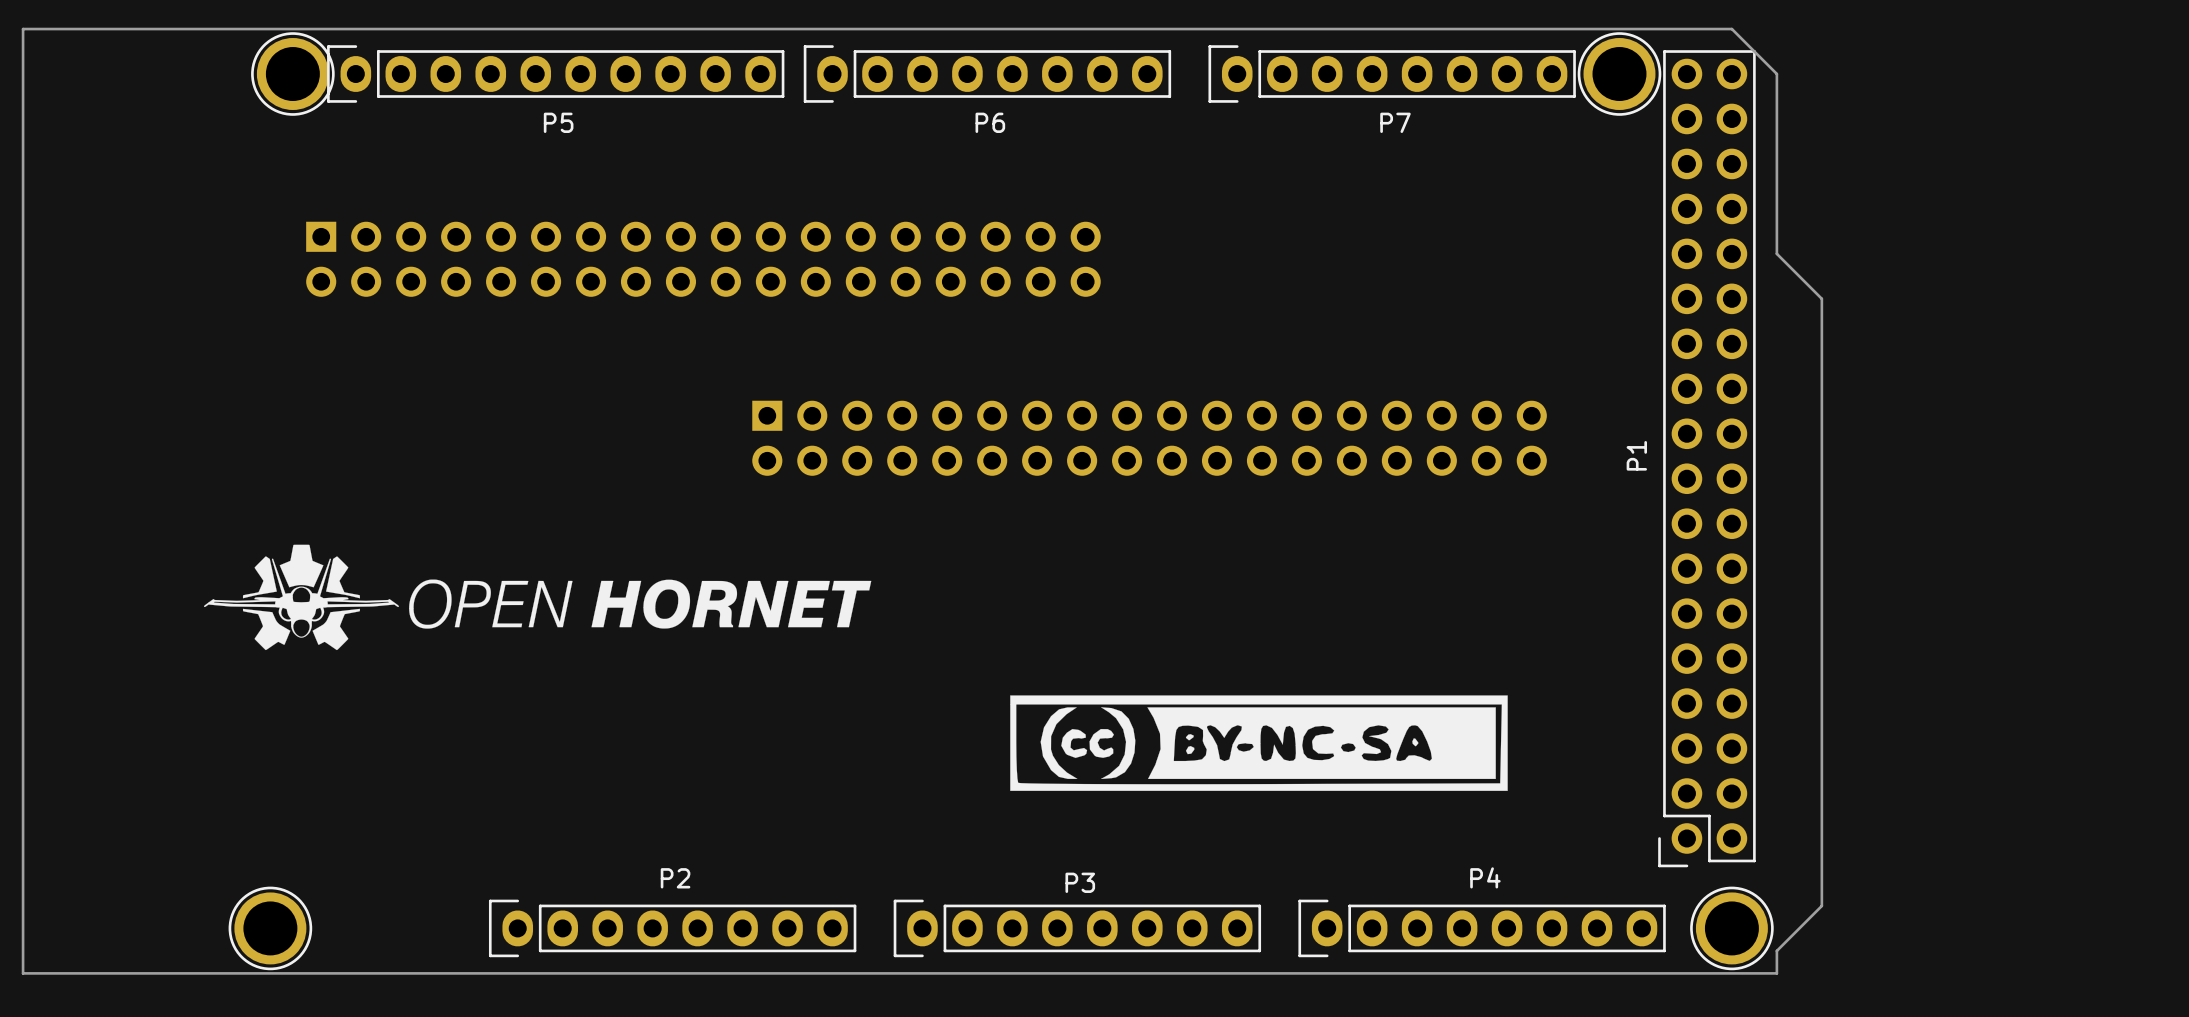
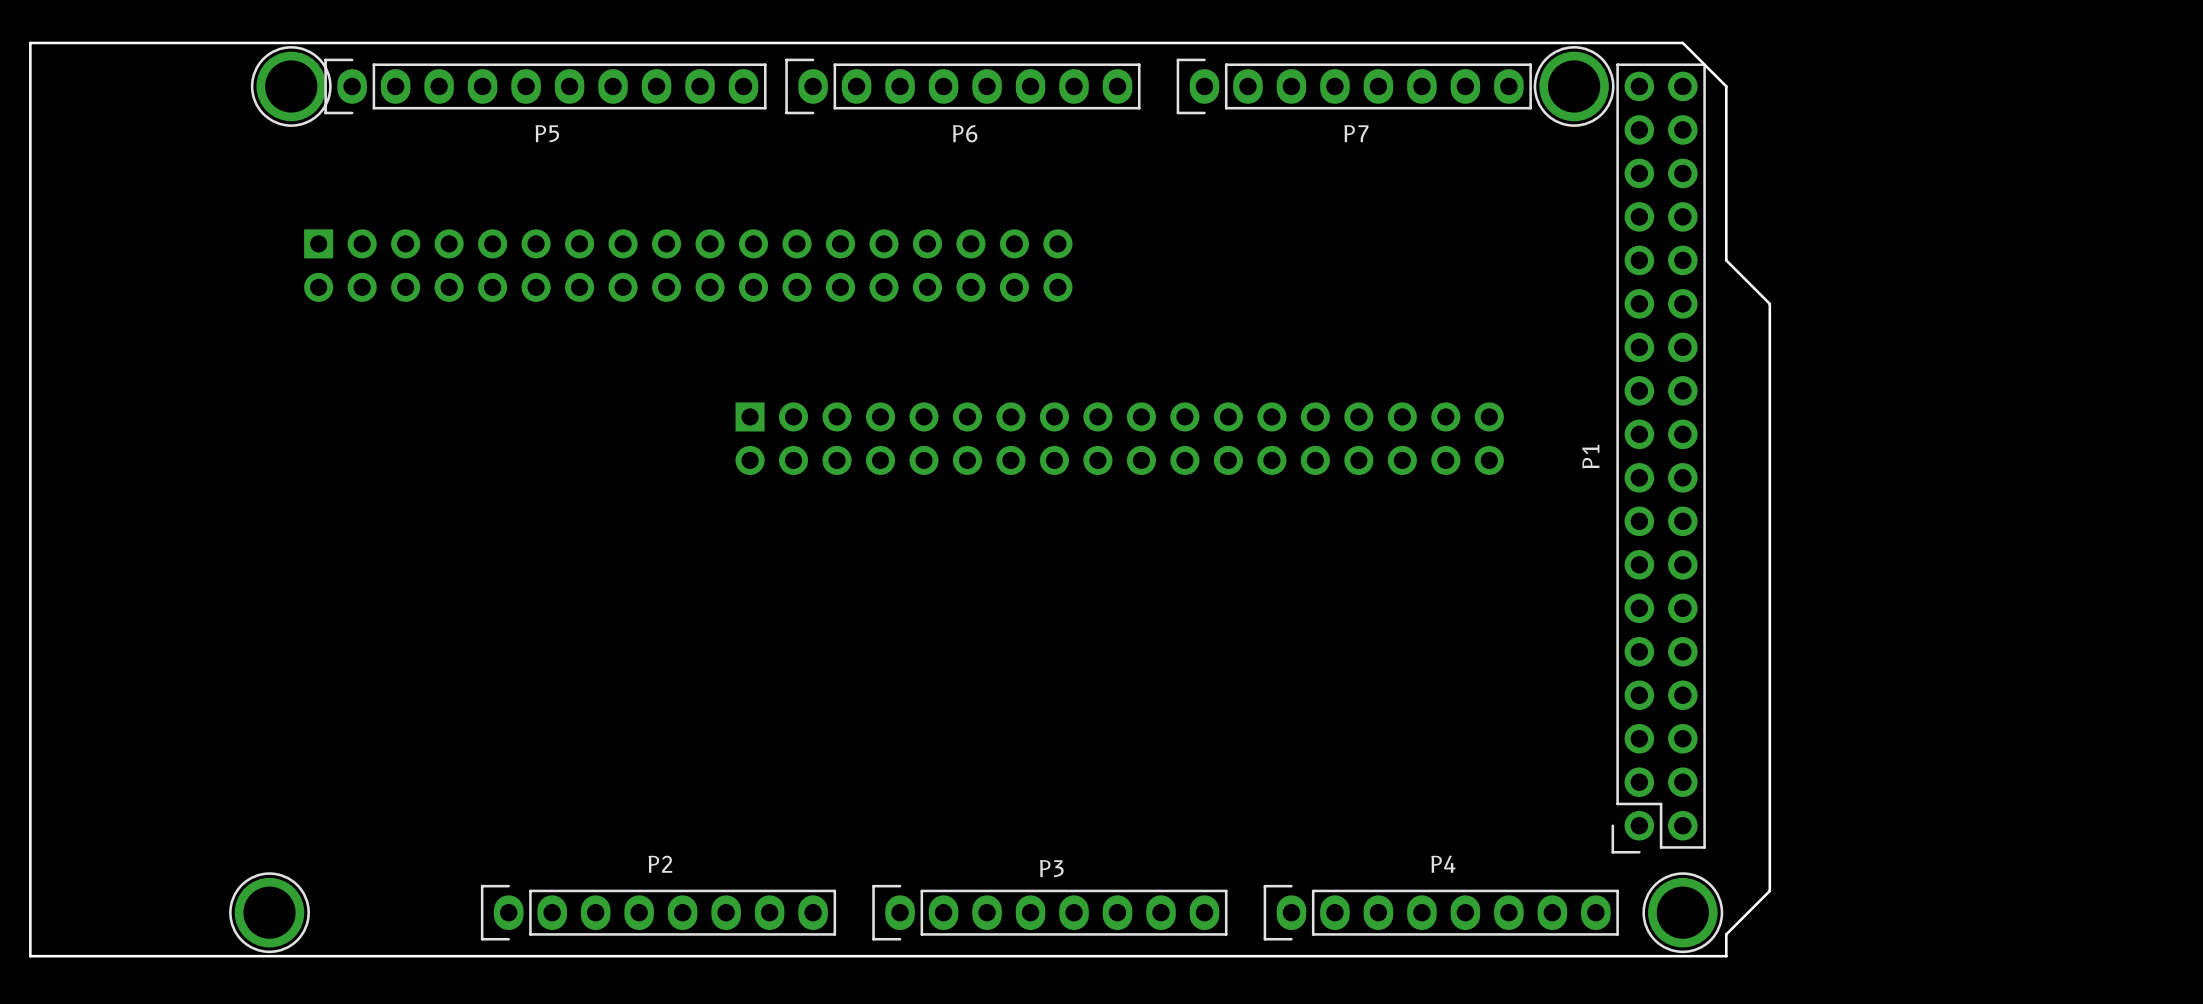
drawing: [204, 544, 872, 651] -> none
drawing: [1010, 695, 1508, 791] -> none

